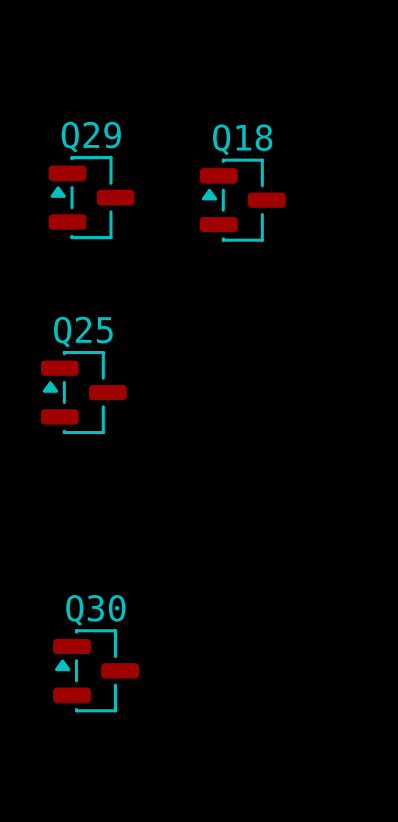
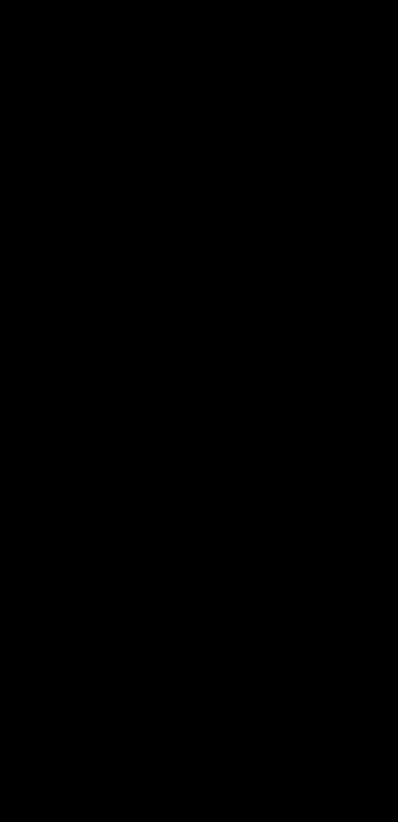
Q29: (91, 197) -> none
Q18: (242, 200) -> none
Q25: (83, 392) -> none
Q30: (95, 670) -> none

